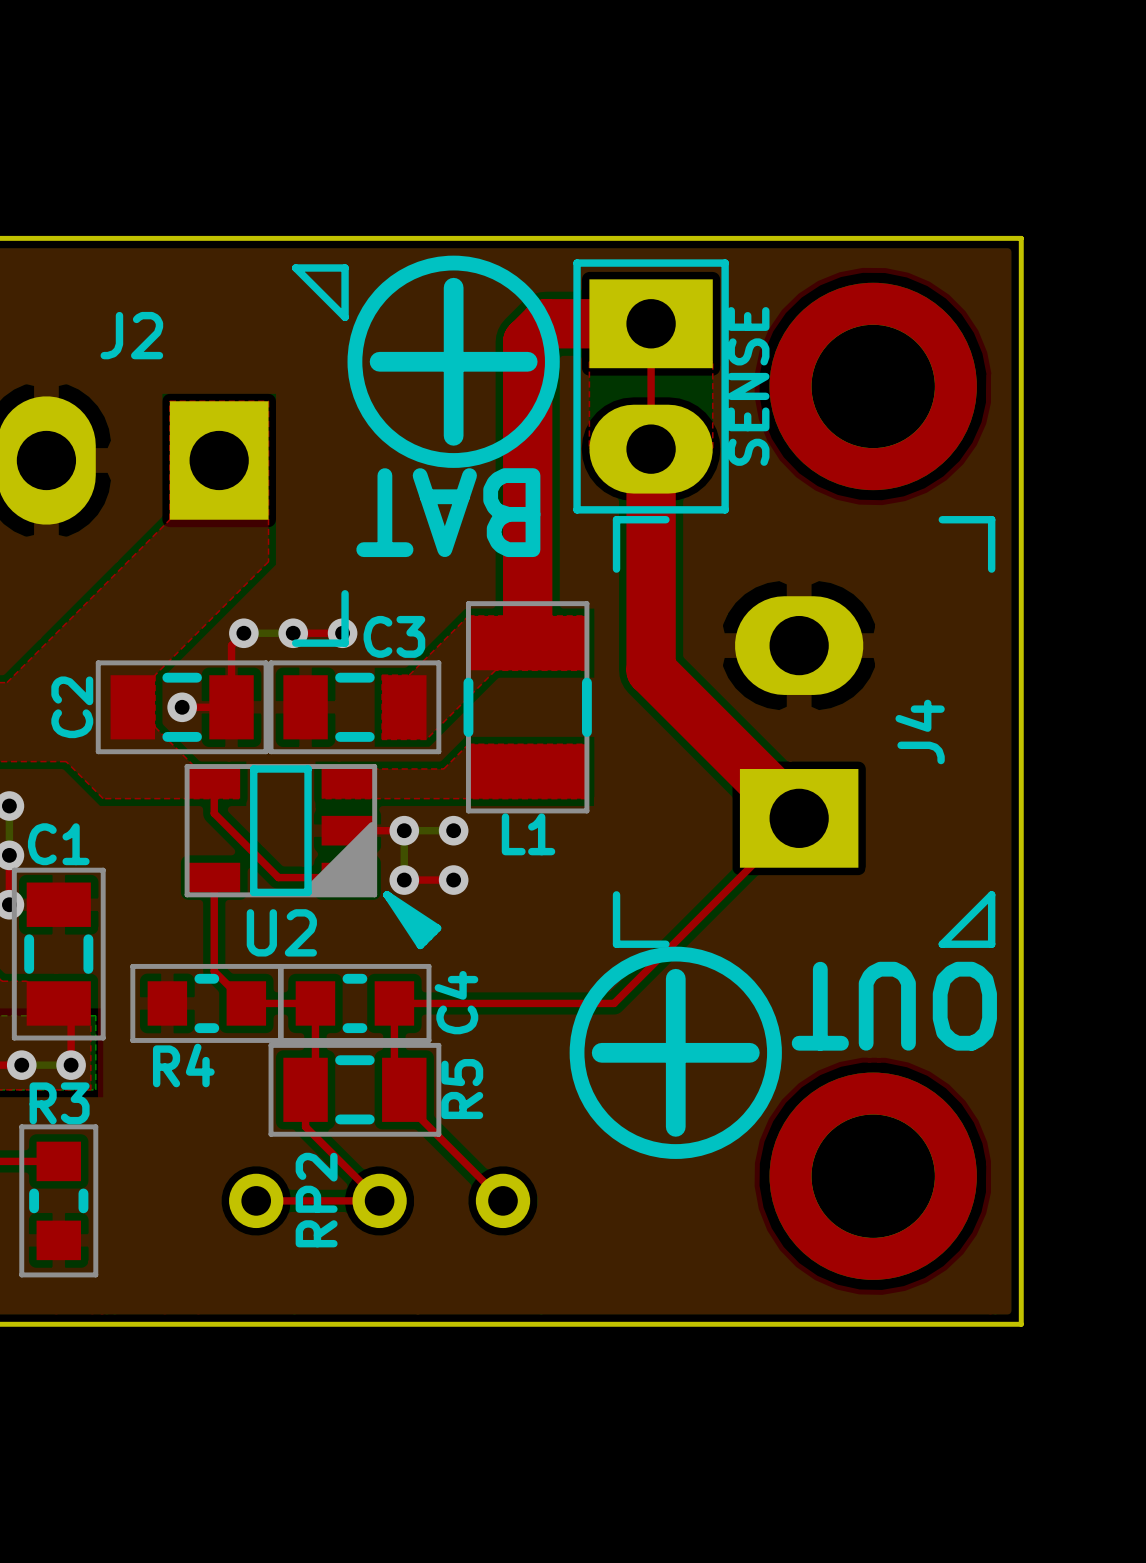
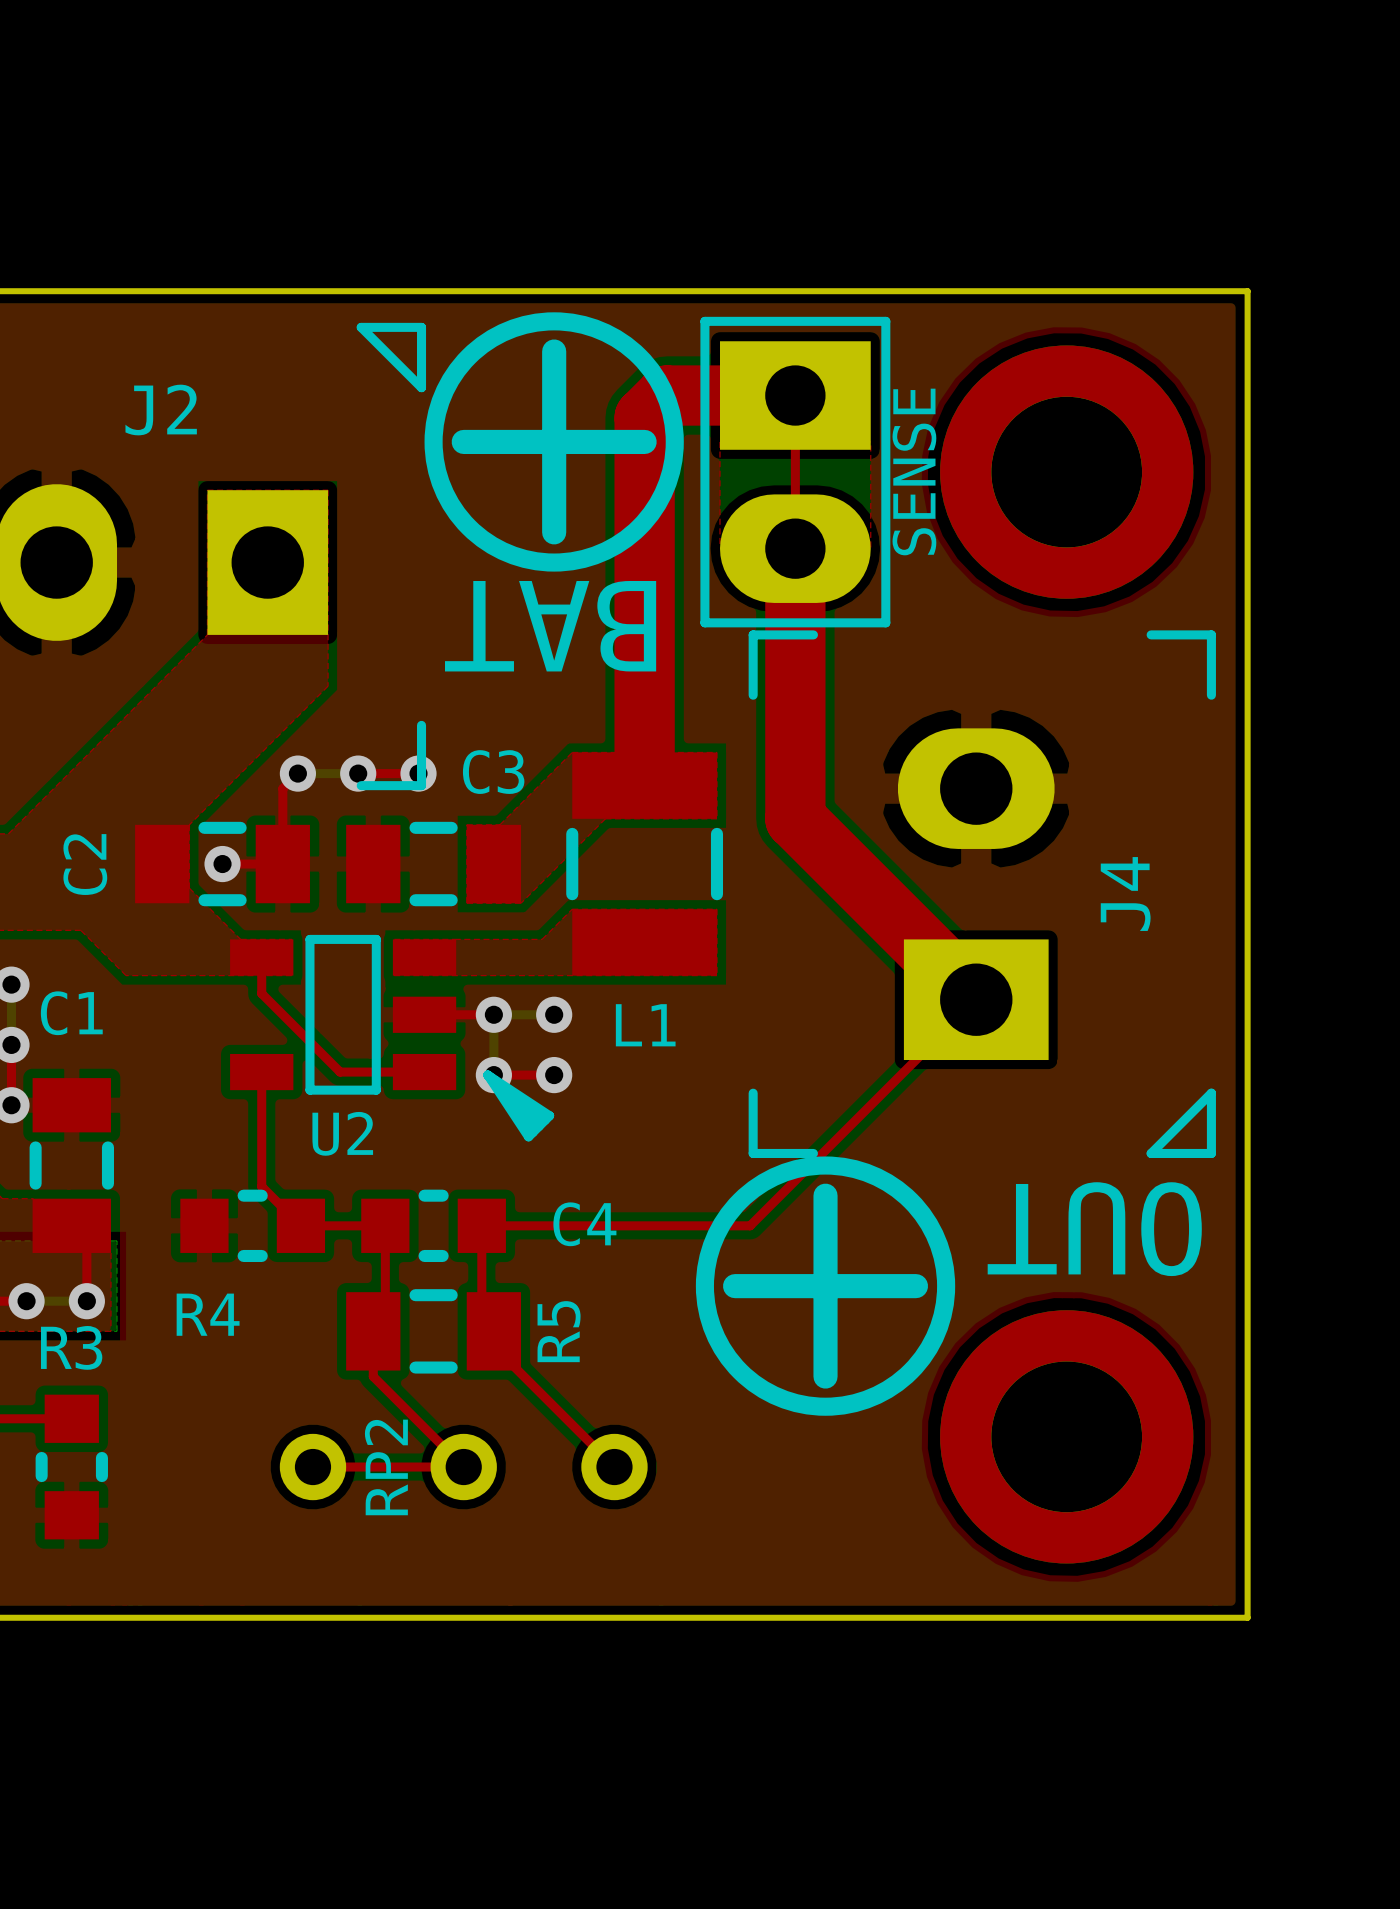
L1 footprint: [463, 601, 592, 814] -> [566, 752, 724, 976]
C2 footprint: [95, 660, 269, 755] -> [135, 821, 310, 907]
C3 footprint: [268, 660, 442, 755] -> [346, 821, 522, 907]
U2 footprint: [184, 764, 442, 950] -> [230, 934, 555, 1142]
C1 footprint: [11, 867, 106, 1041] -> [29, 1078, 115, 1253]
R4 footprint: [130, 963, 284, 1043] -> [180, 1189, 326, 1263]
C4 footprint: [278, 963, 432, 1043] -> [361, 1189, 506, 1263]
R5 footprint: [268, 1042, 442, 1137] -> [346, 1289, 522, 1374]
R3 footprint: [19, 1124, 99, 1278] -> [35, 1394, 108, 1540]

